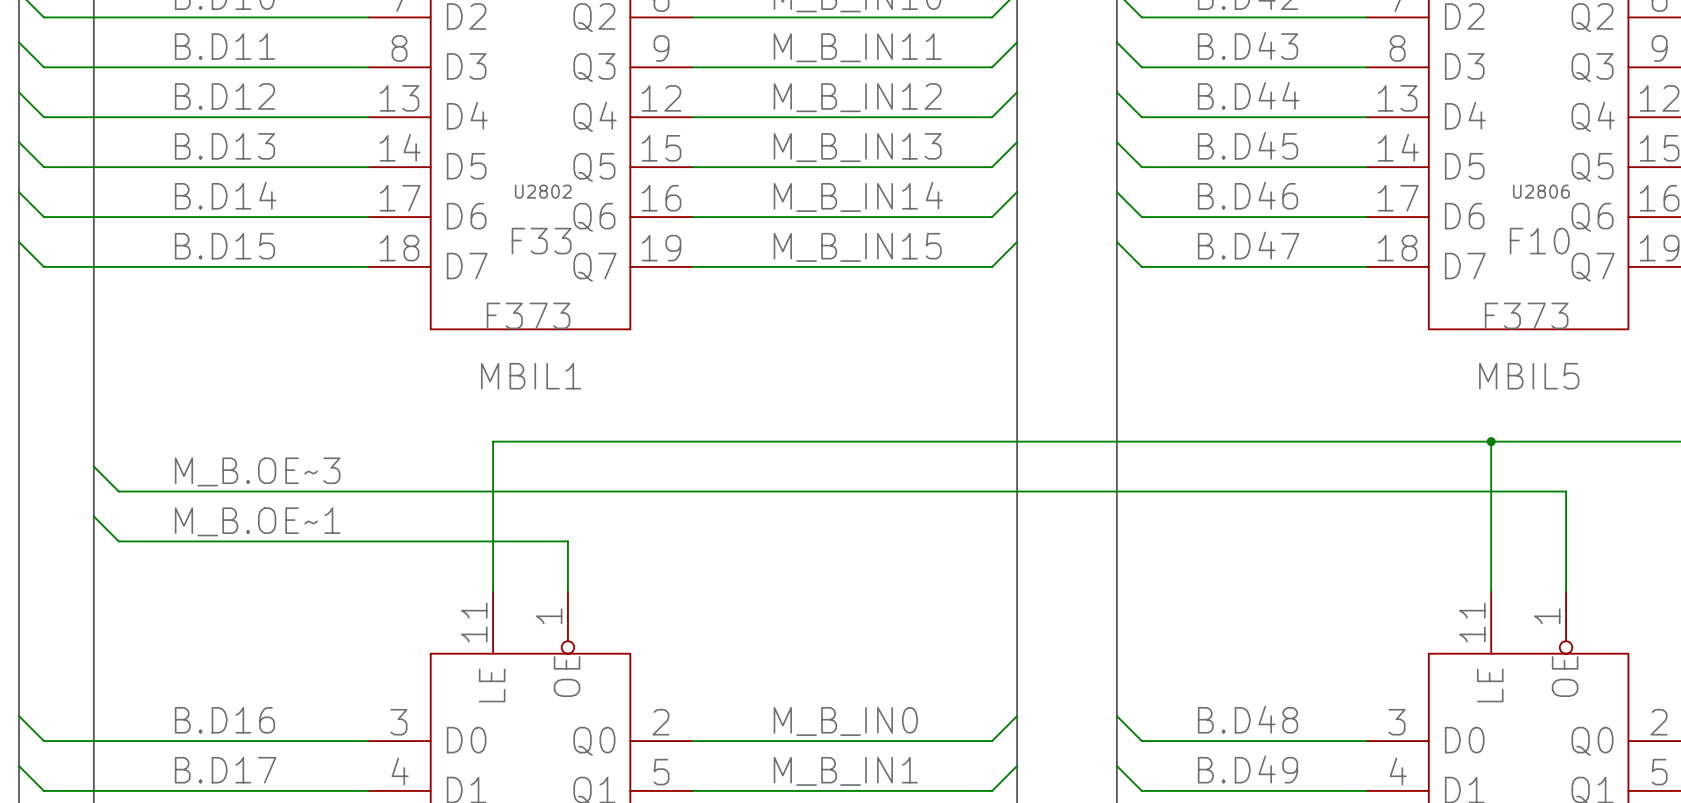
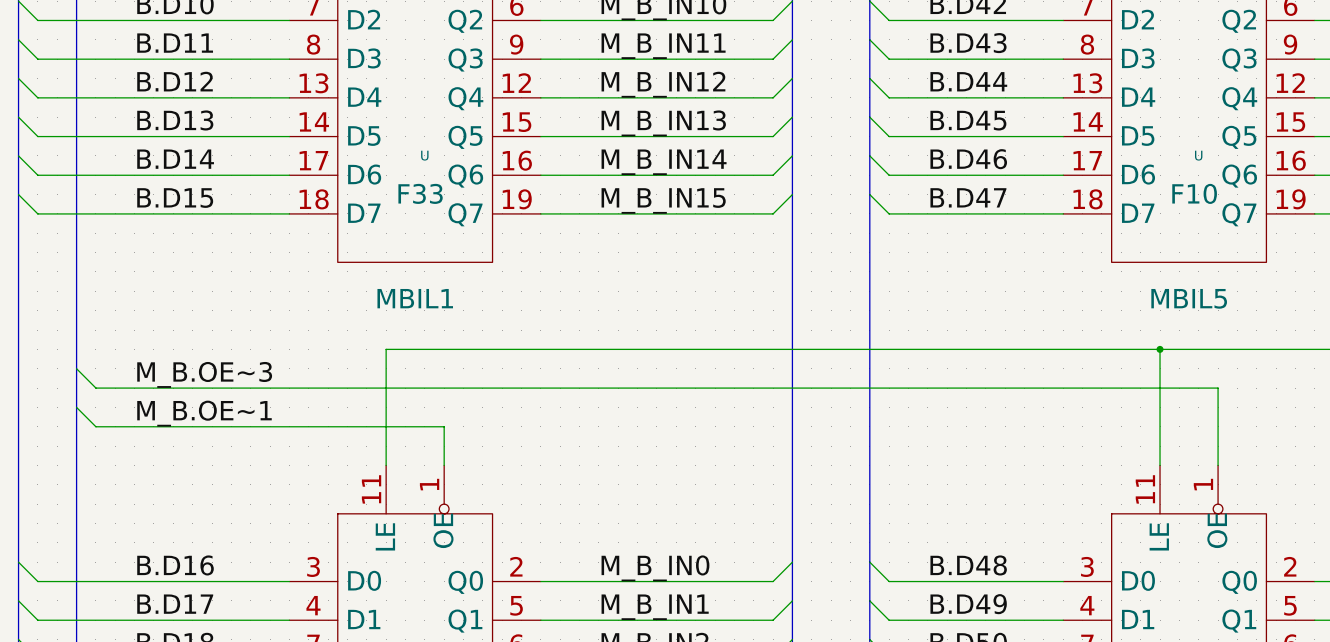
U2802 name: U2802 (543, 191) -> U (424, 155)
U2806 name: U2806 (1541, 191) -> U (1198, 155)
U2802 value: F373 (528, 315) -> none
U2806 value: F373 (1526, 315) -> none

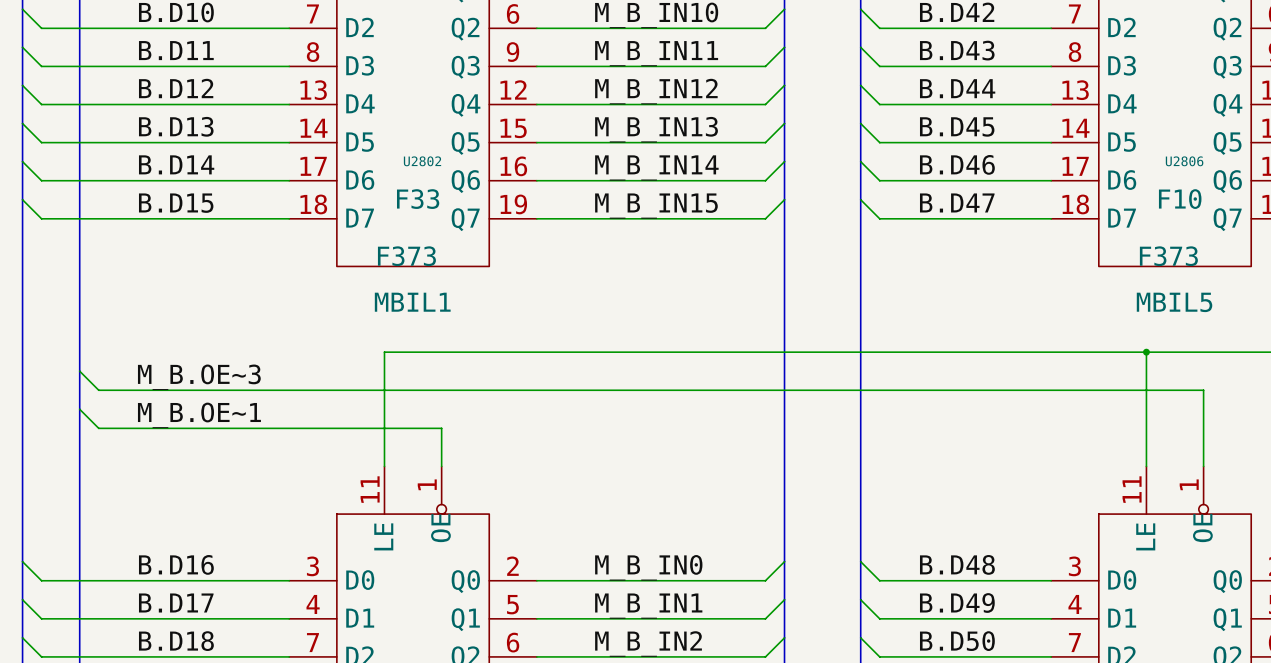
U name: U (424, 155) -> U2802 (422, 161)
U name: U (1198, 155) -> U2806 (1184, 161)
U value: none -> F373 (406, 256)
U value: none -> F373 (1168, 256)

